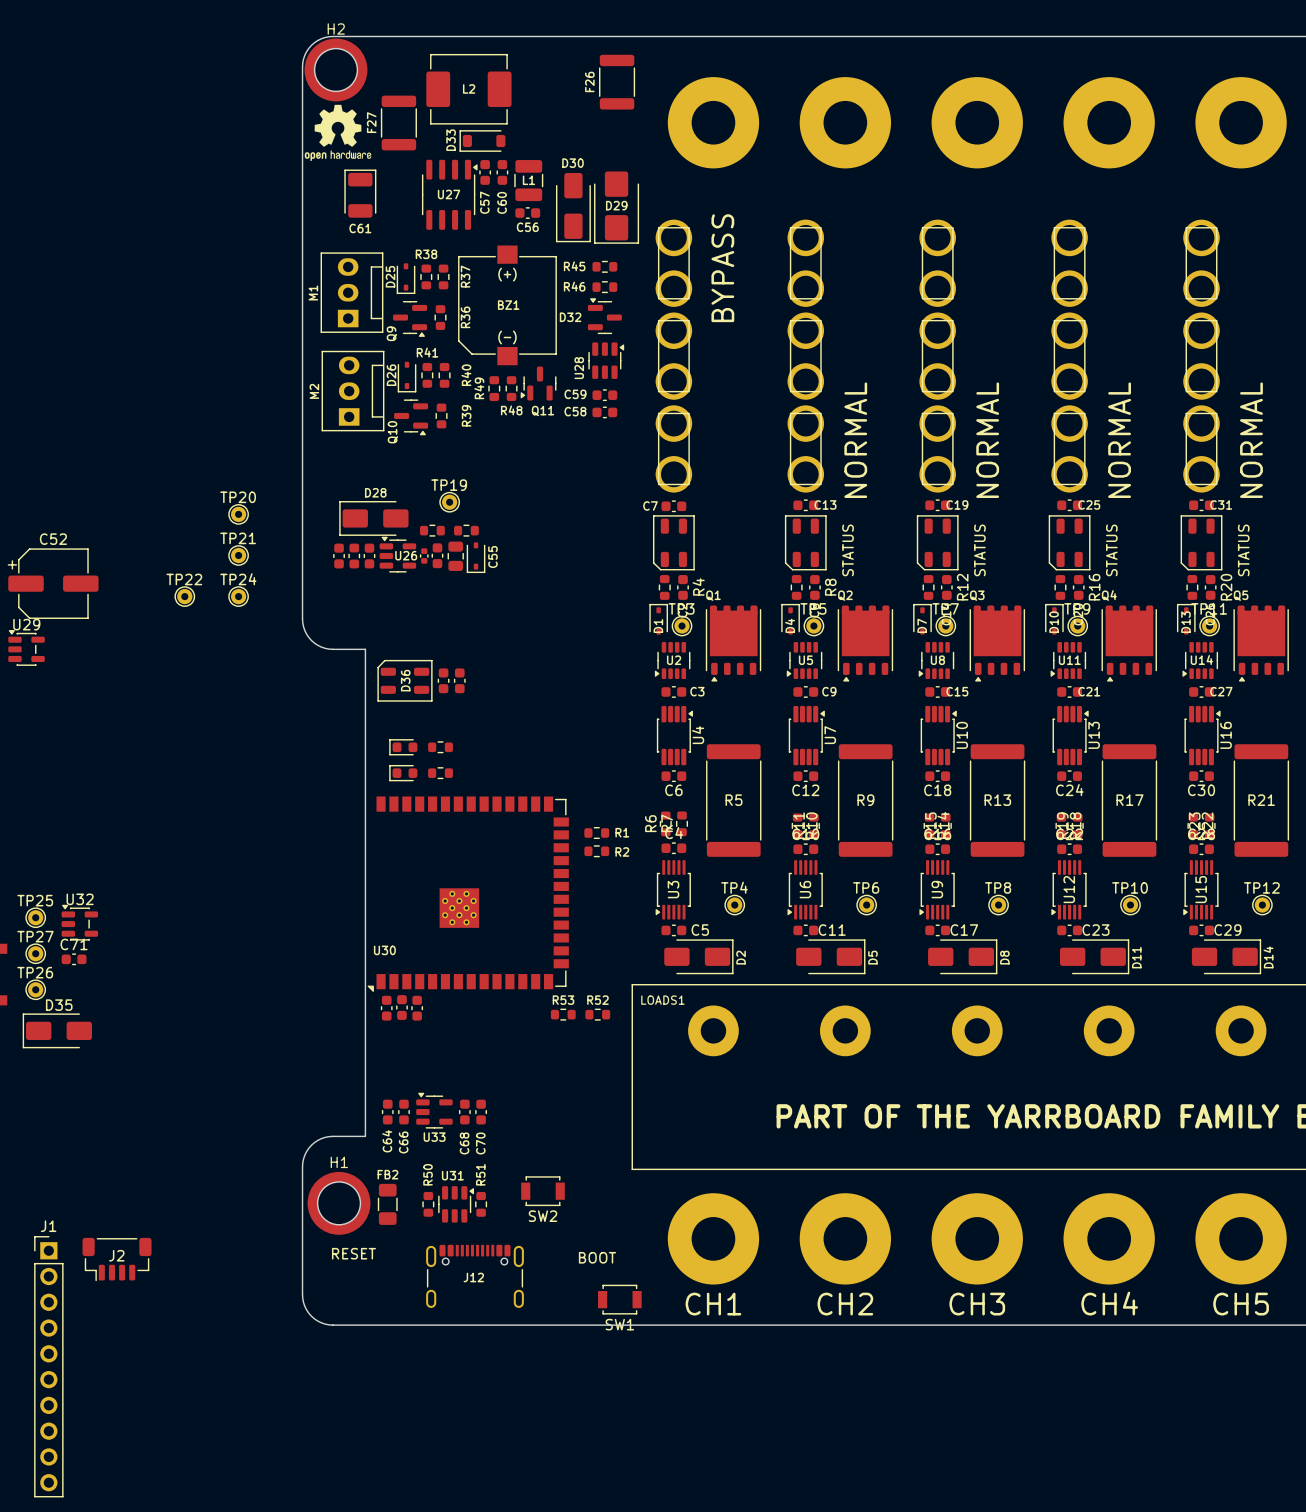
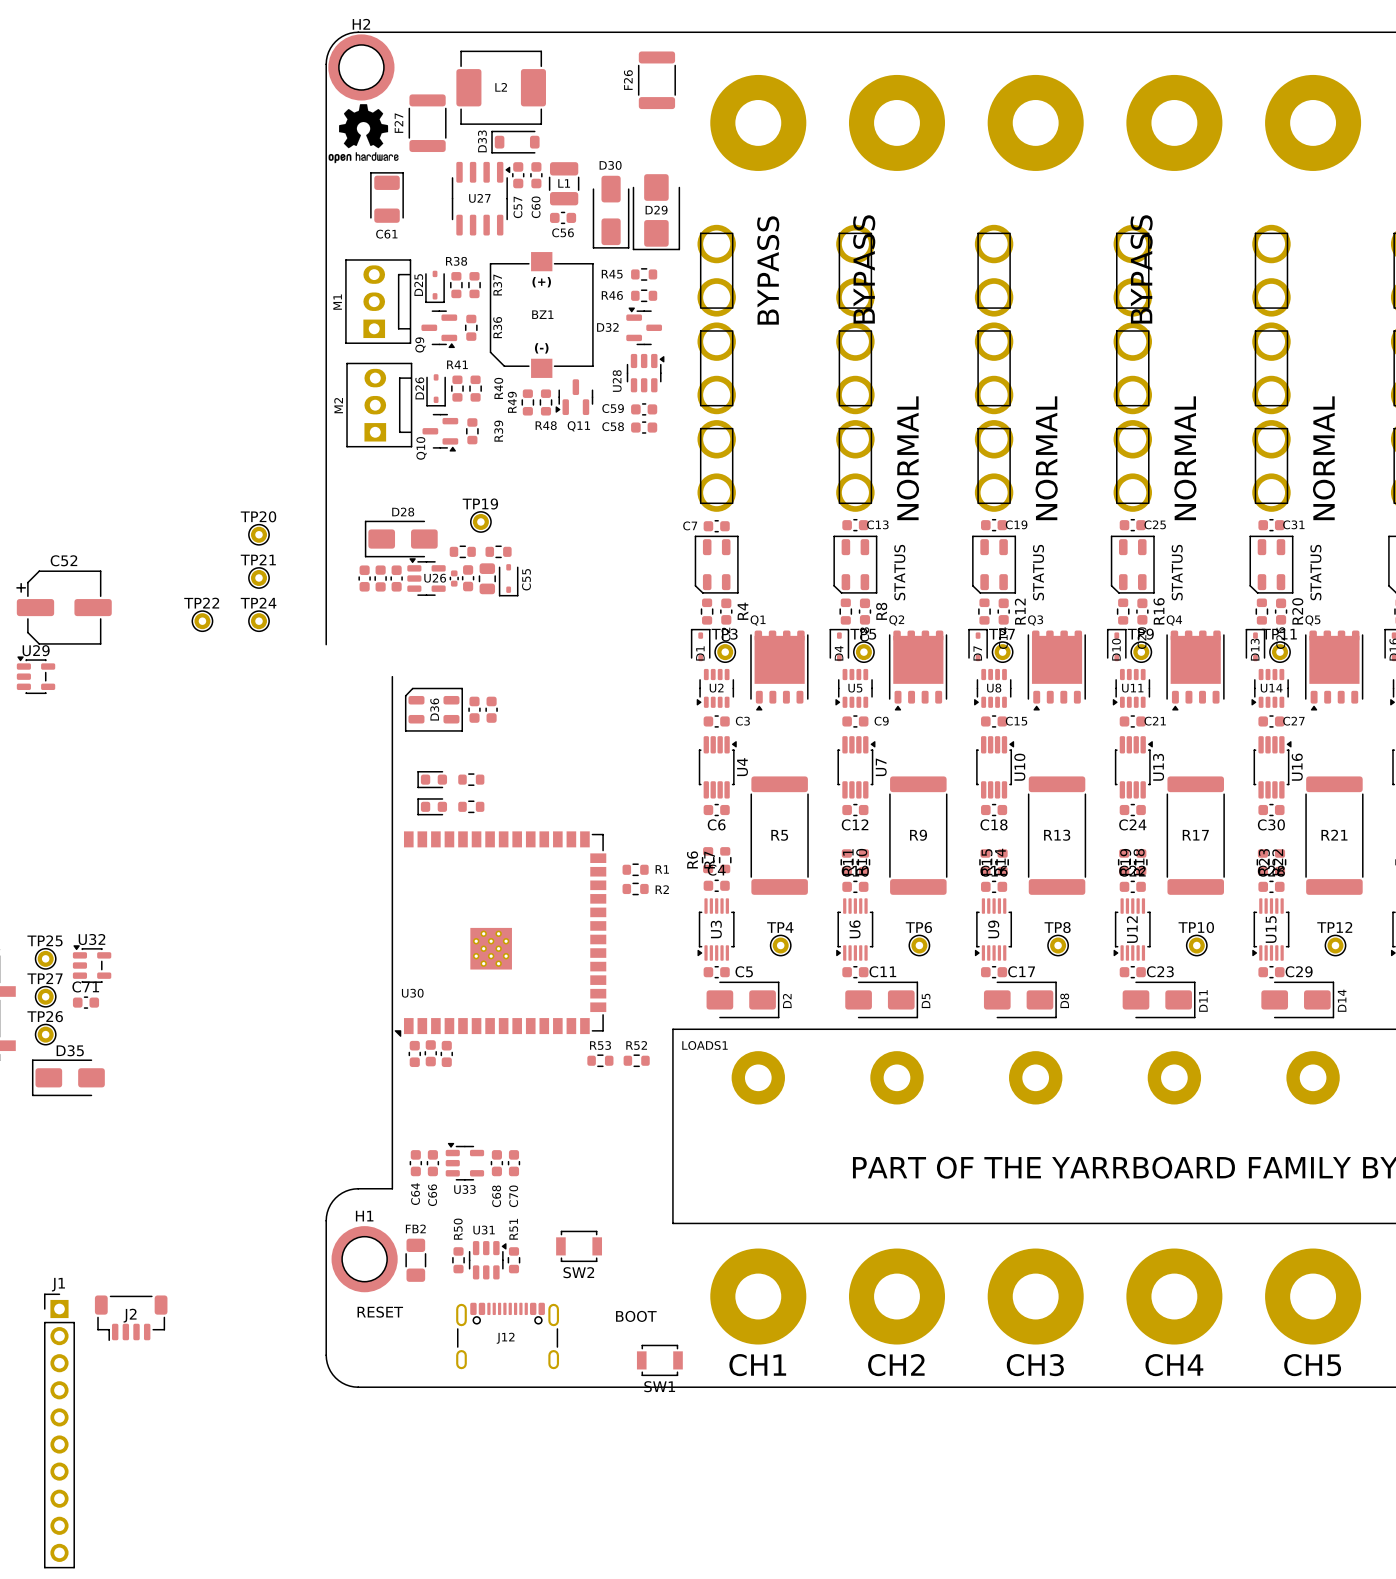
text: none -> BYPASS (864, 269)
text: none -> BYPASS (1141, 269)
board edge: (302, 618) (306, 634) (314, 643) (321, 647) (332, 649) (365, 649) -> none

